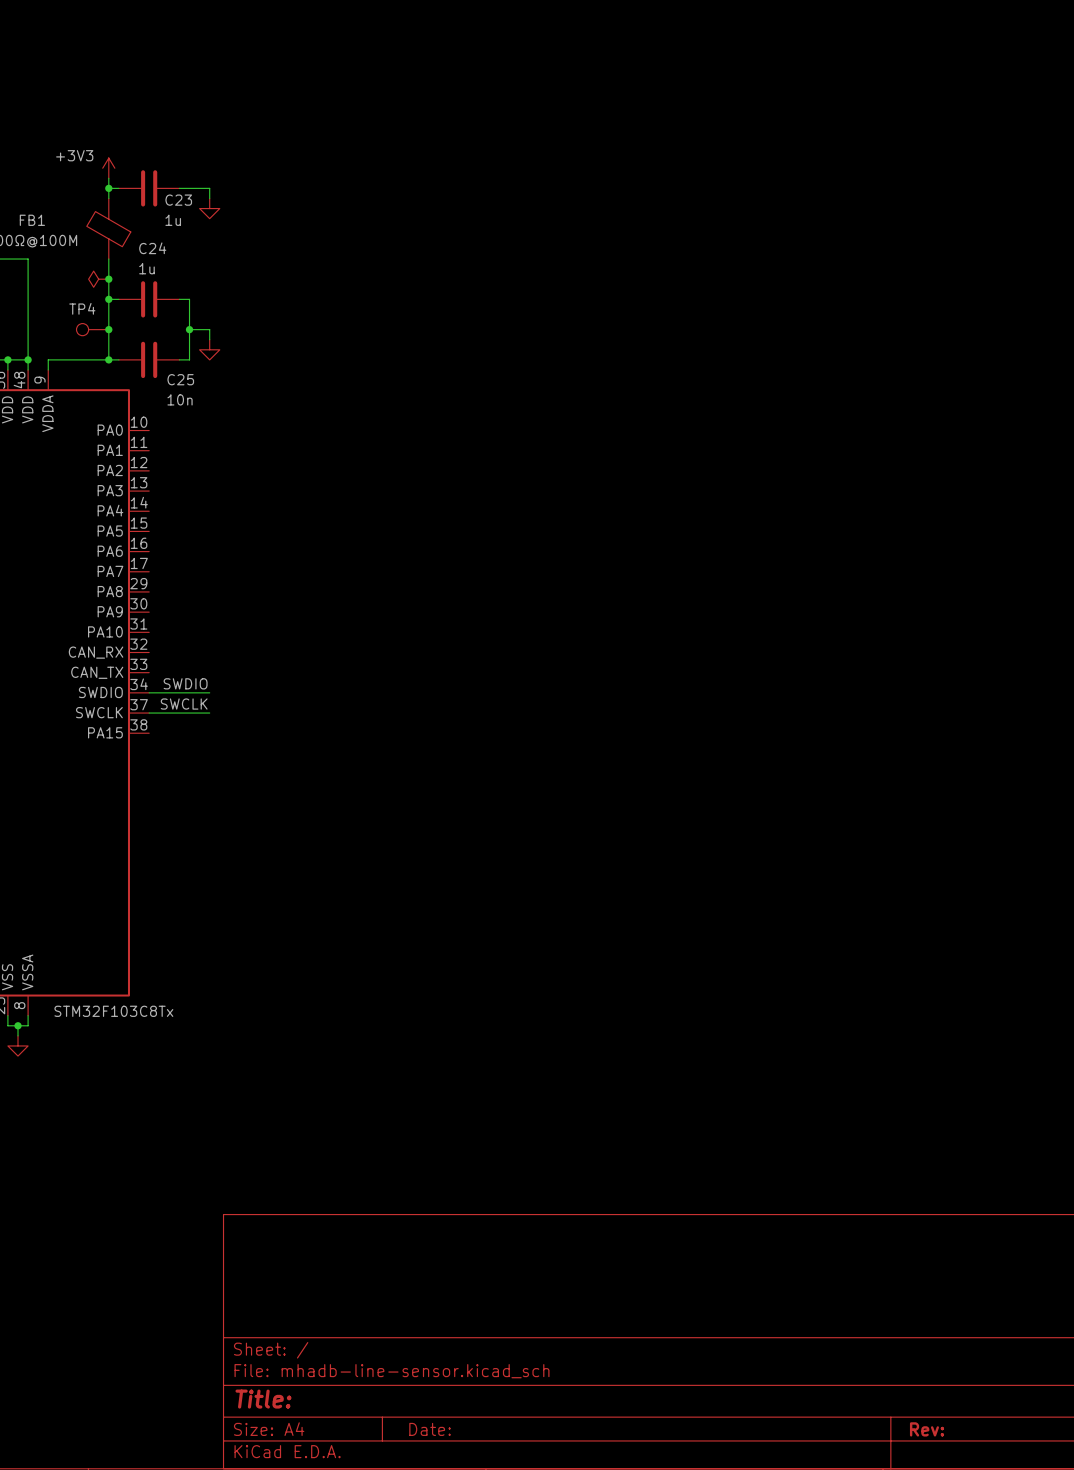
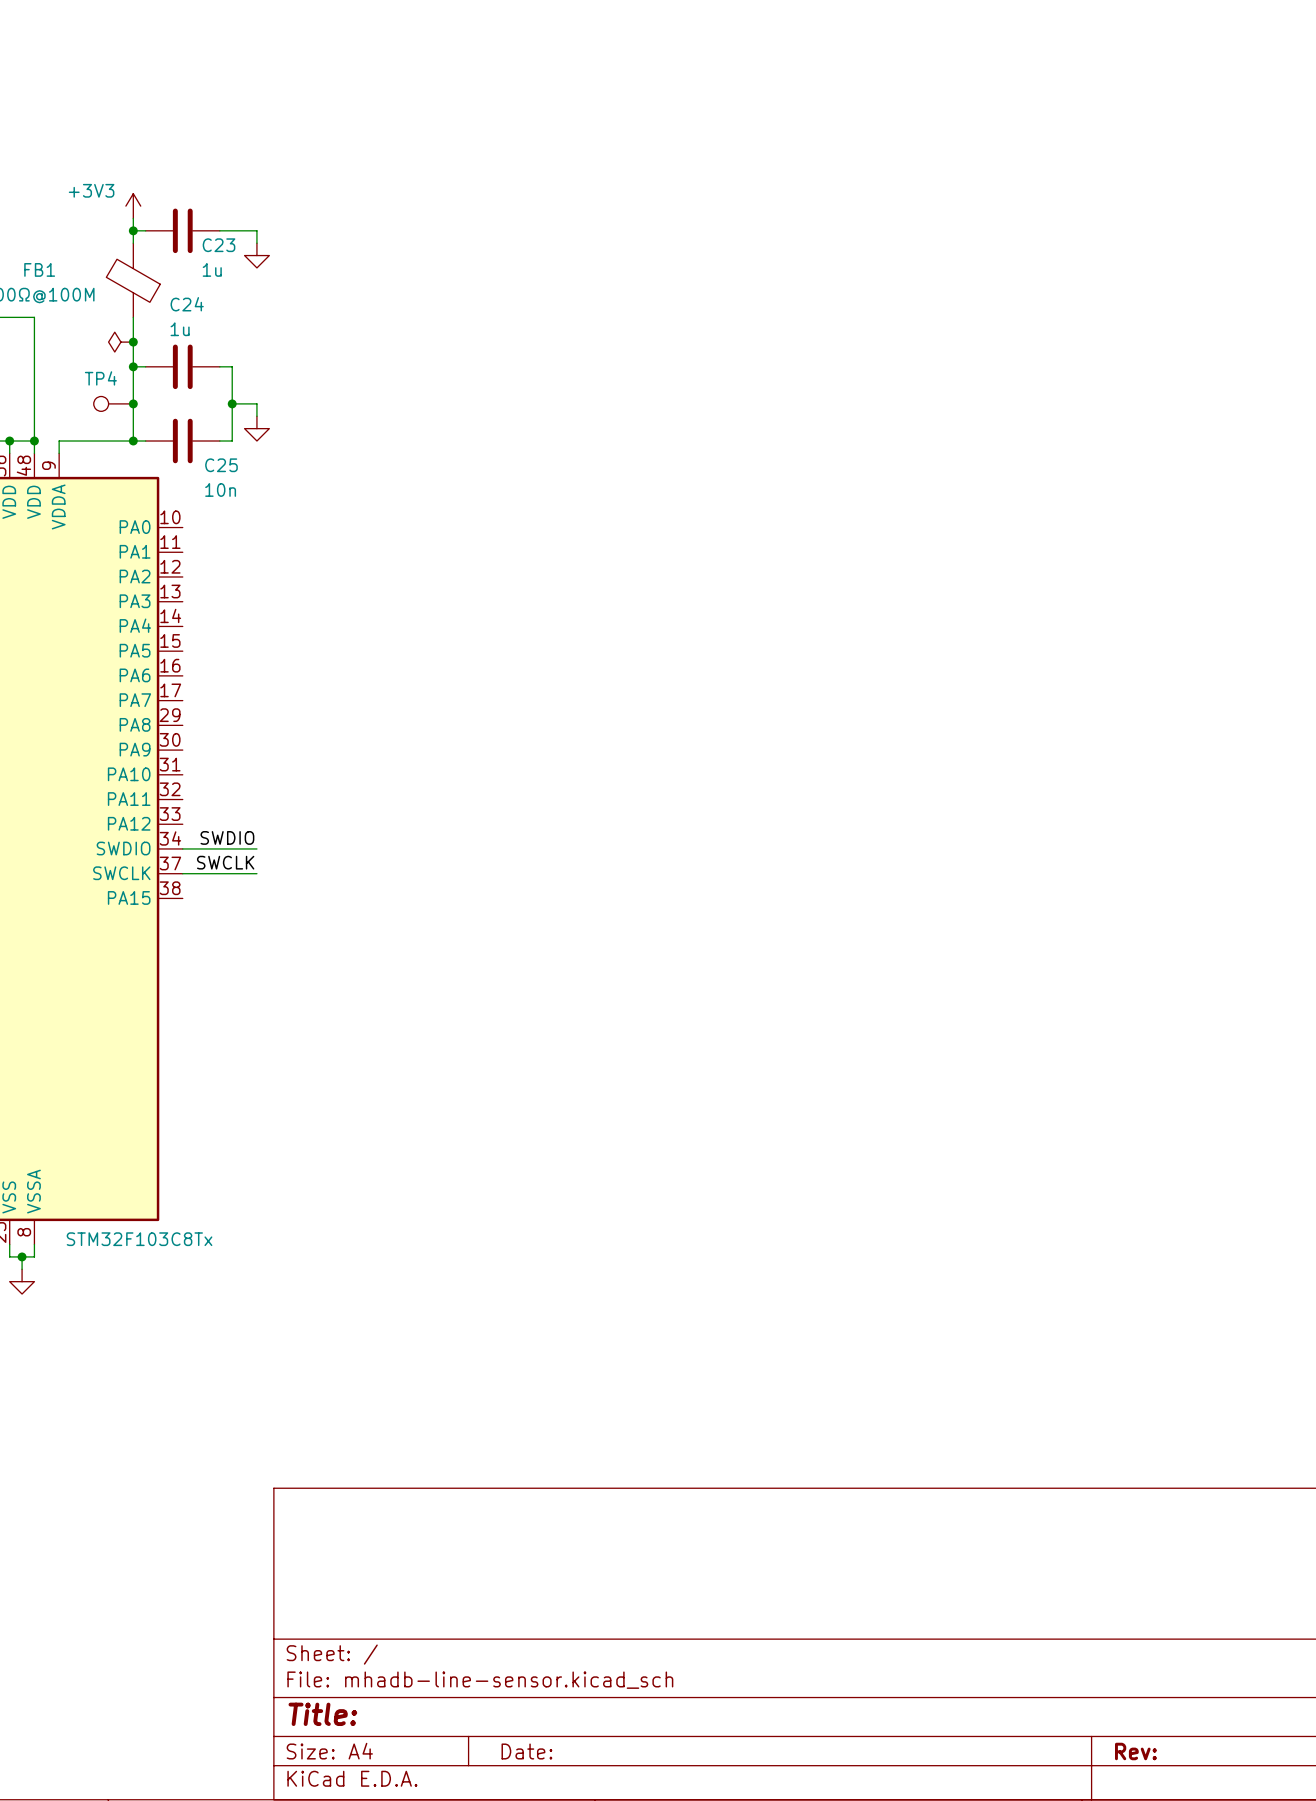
part pin name: CAN_RX (96, 652) -> PA11 (129, 799)
part pin name: CAN_TX (97, 672) -> PA12 (129, 823)

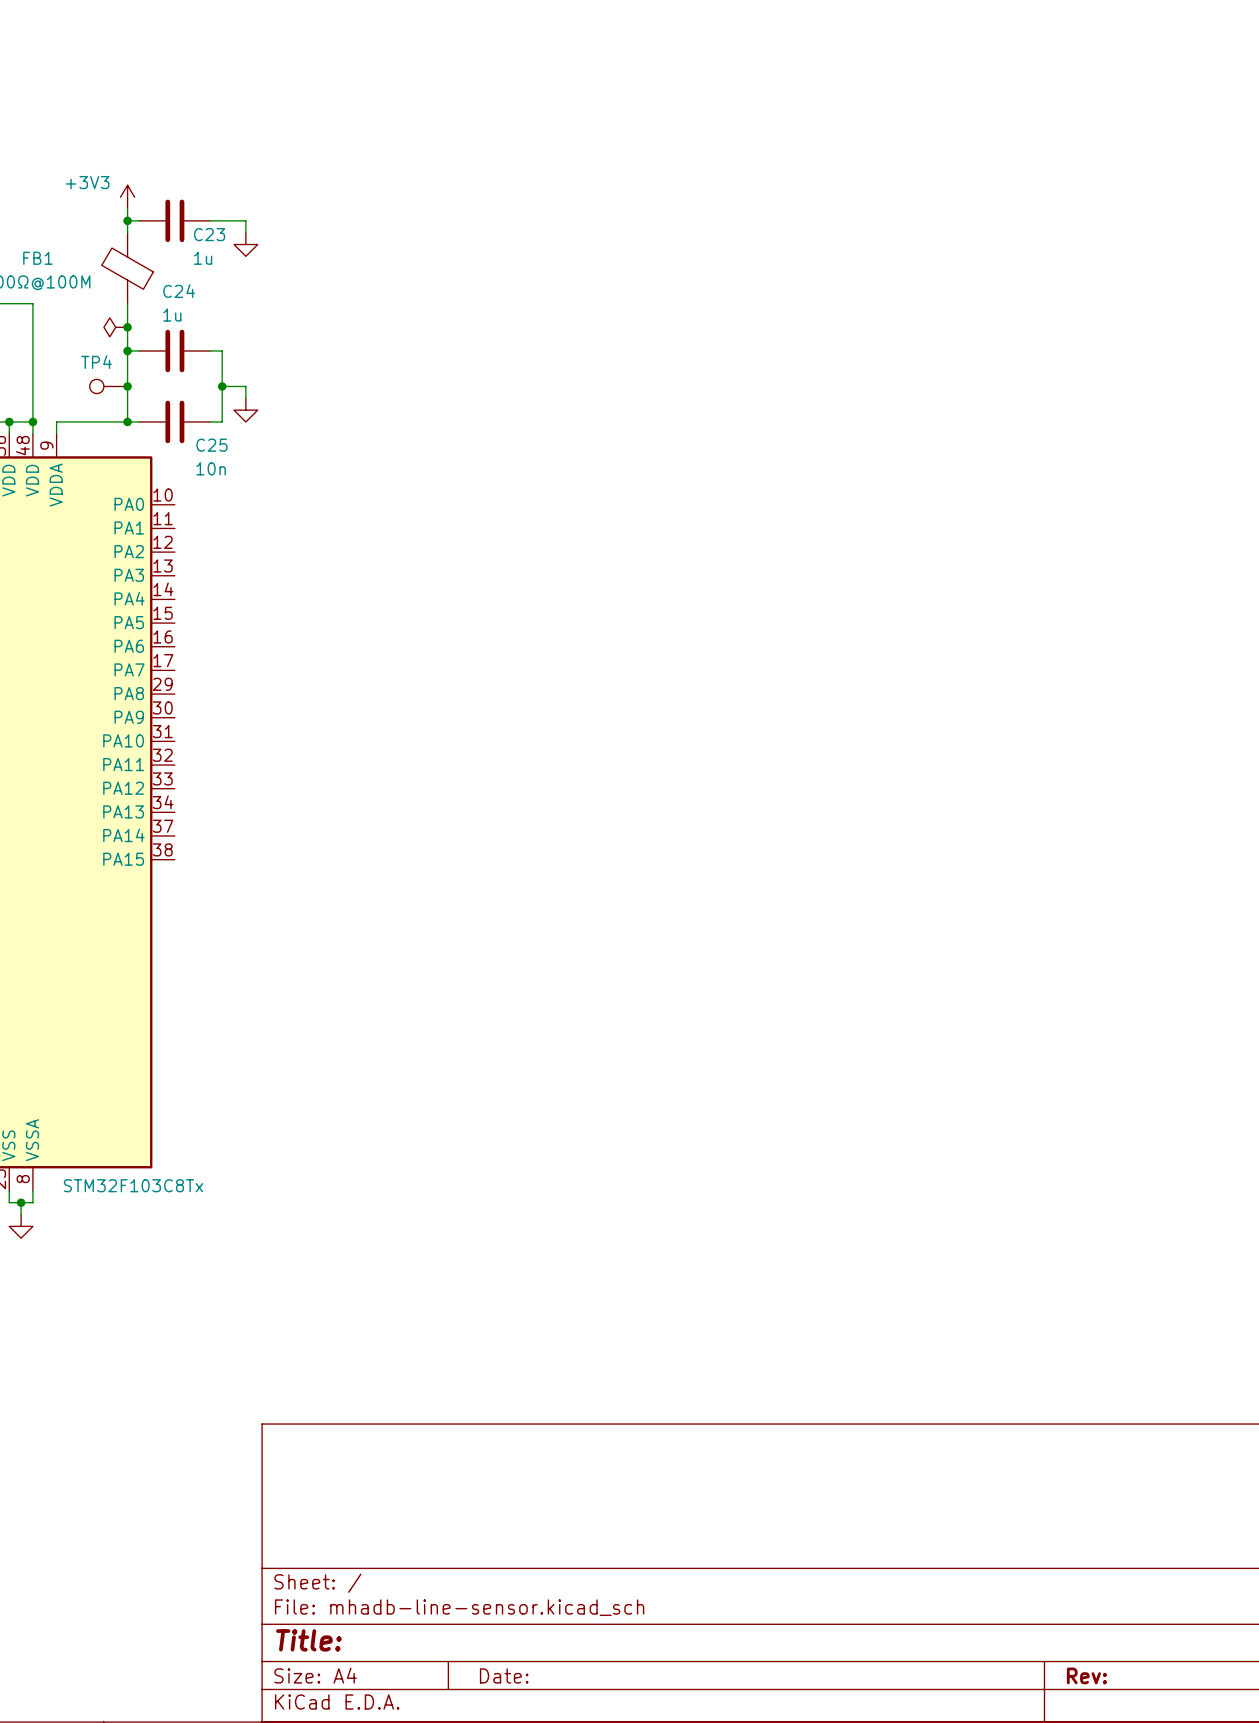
label: SWDIO (227, 837) -> none
part pin name: SWDIO (123, 848) -> PA13 (123, 811)
wire: (182, 848) (256, 848) -> none
label: SWCLK (225, 862) -> none
part pin name: SWCLK (121, 873) -> PA14 (123, 835)
wire: (182, 873) (256, 873) -> none

